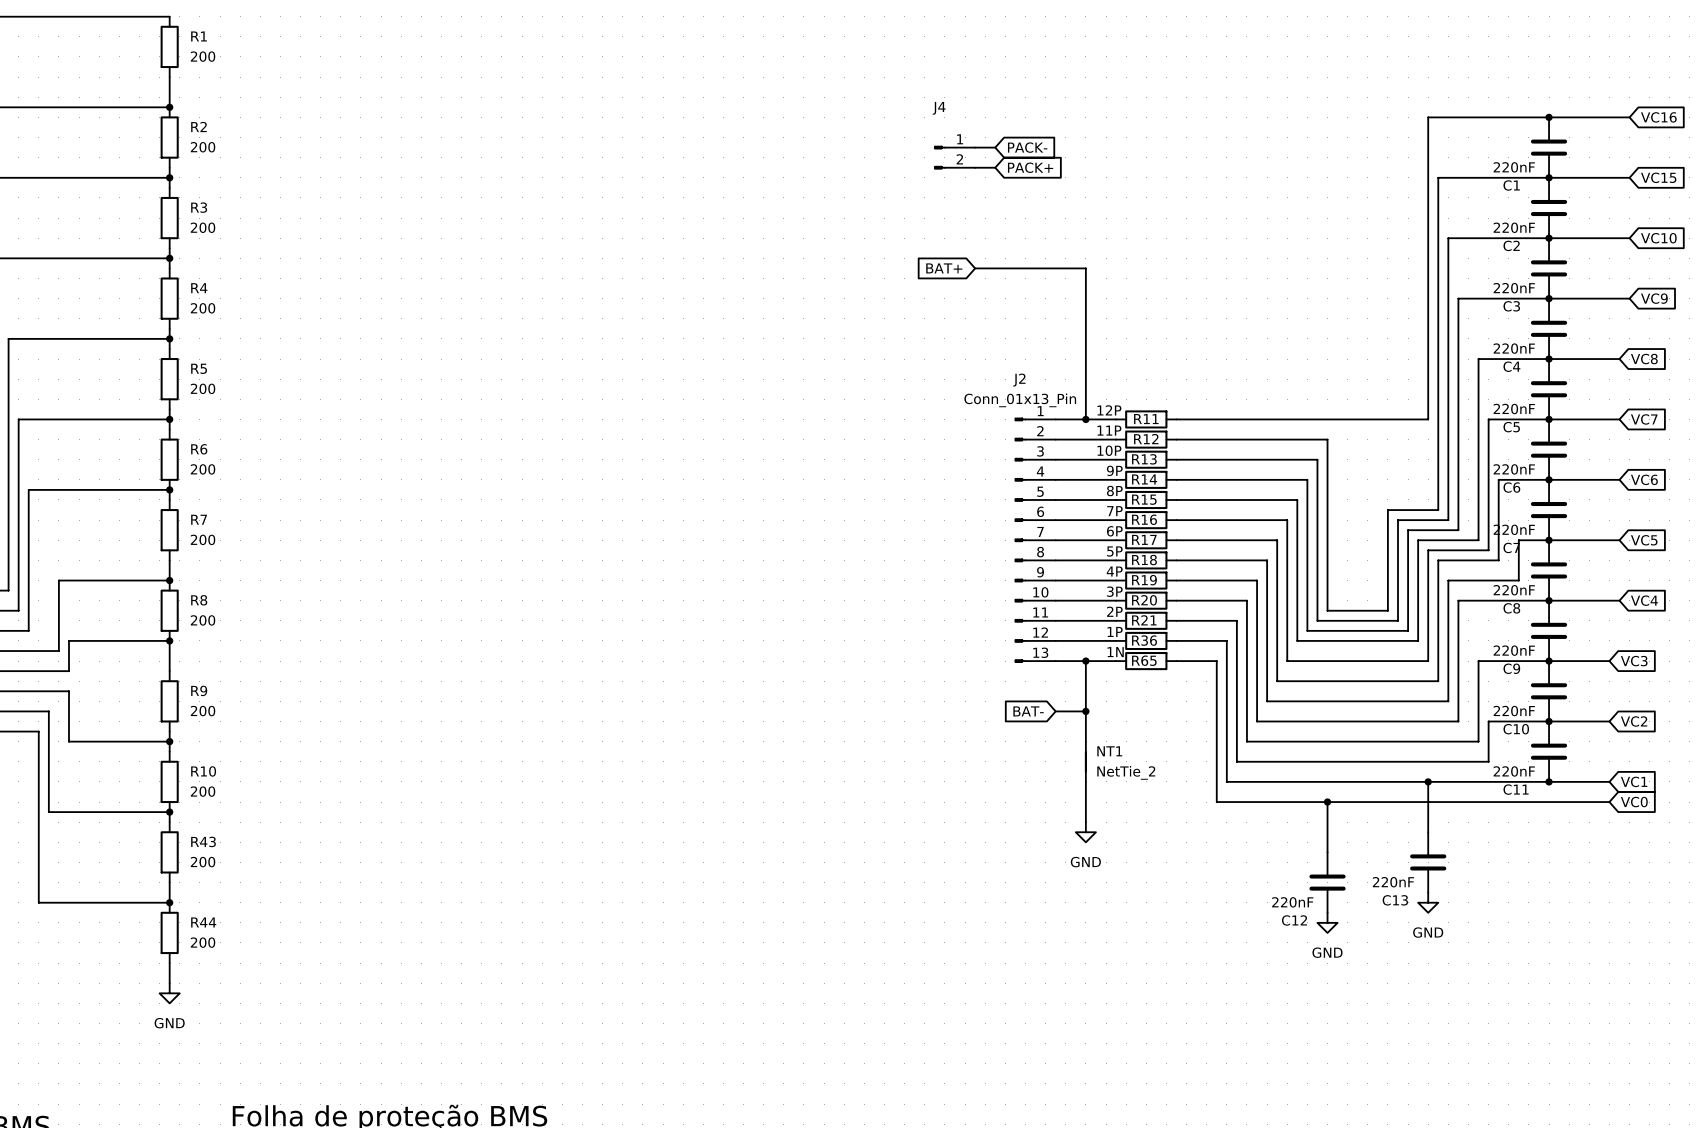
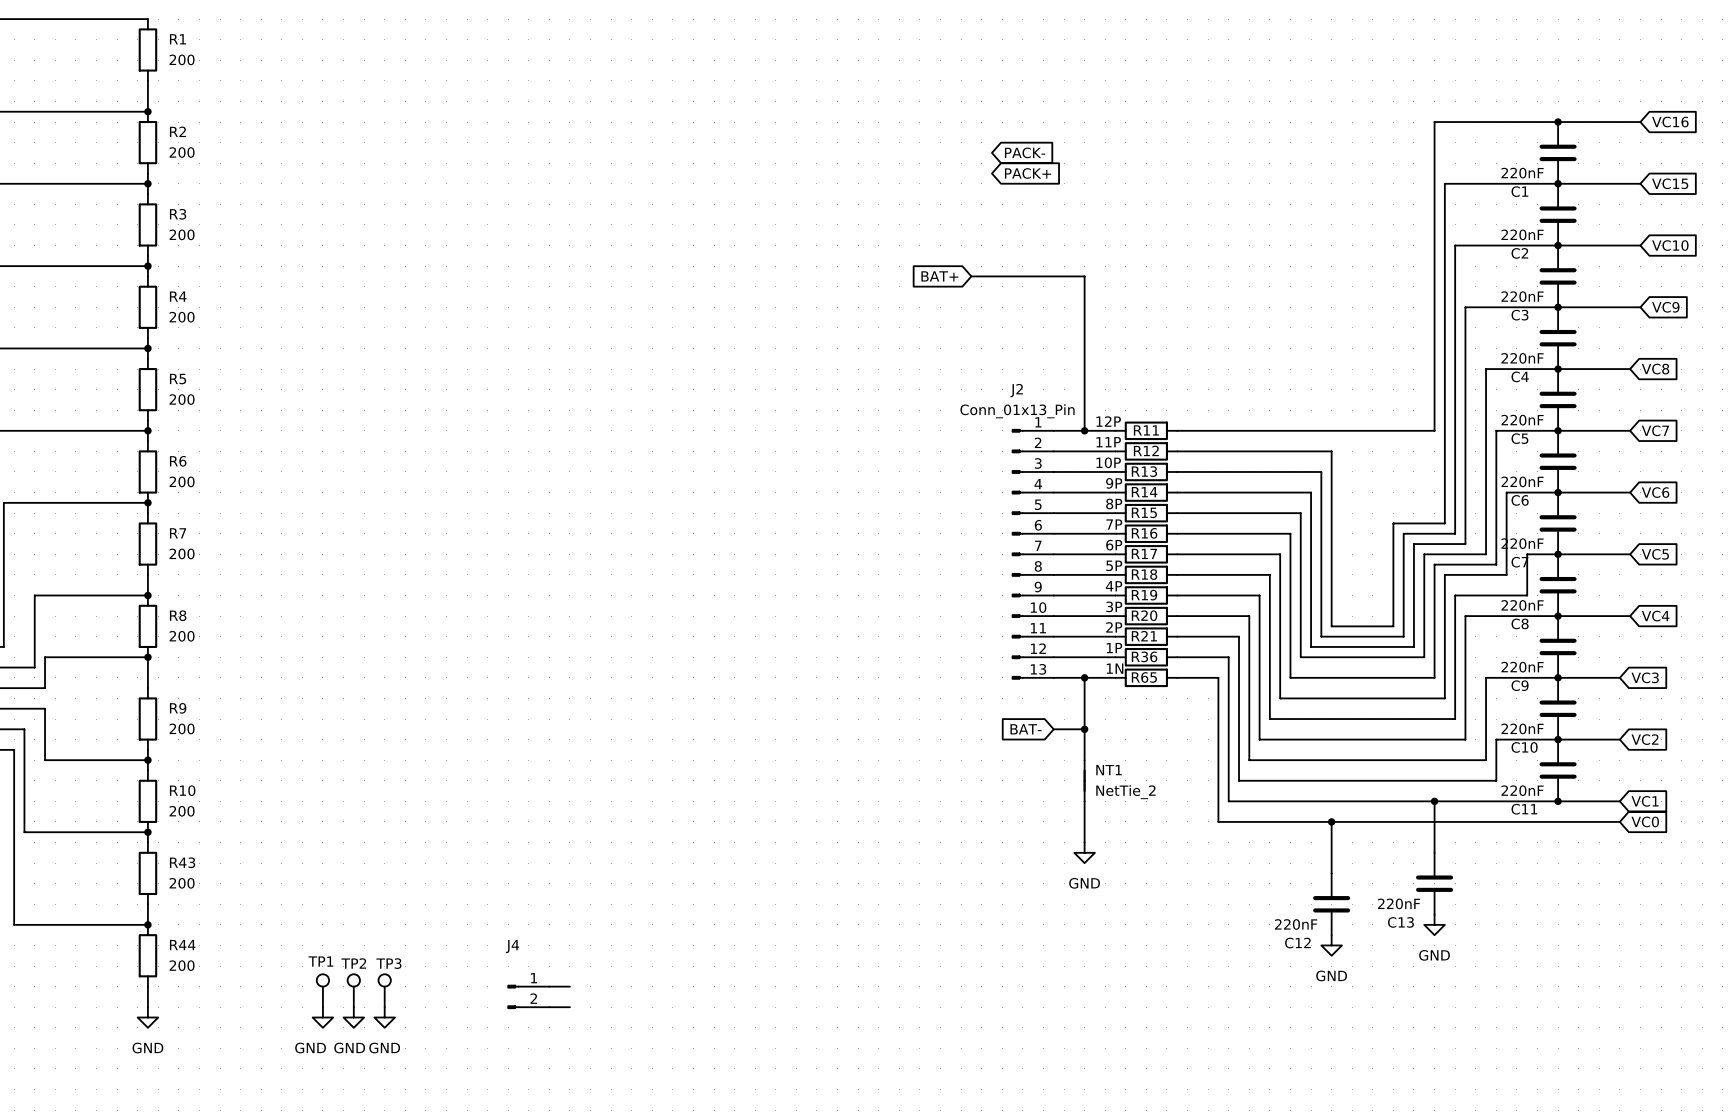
wire: (975, 147) (995, 147) -> none
J4 position: (954, 157) -> (528, 996)
wire: (975, 167) (995, 167) -> none
wire: none -> (549, 986) (569, 986)
TP1: none -> (322, 990)
TP2: none -> (353, 990)
TP3: none -> (384, 990)
wire: none -> (549, 1007) (569, 1007)
power symbol: none -> GND (322, 1017)
power symbol: none -> GND (353, 1017)
power symbol: none -> GND (384, 1017)

